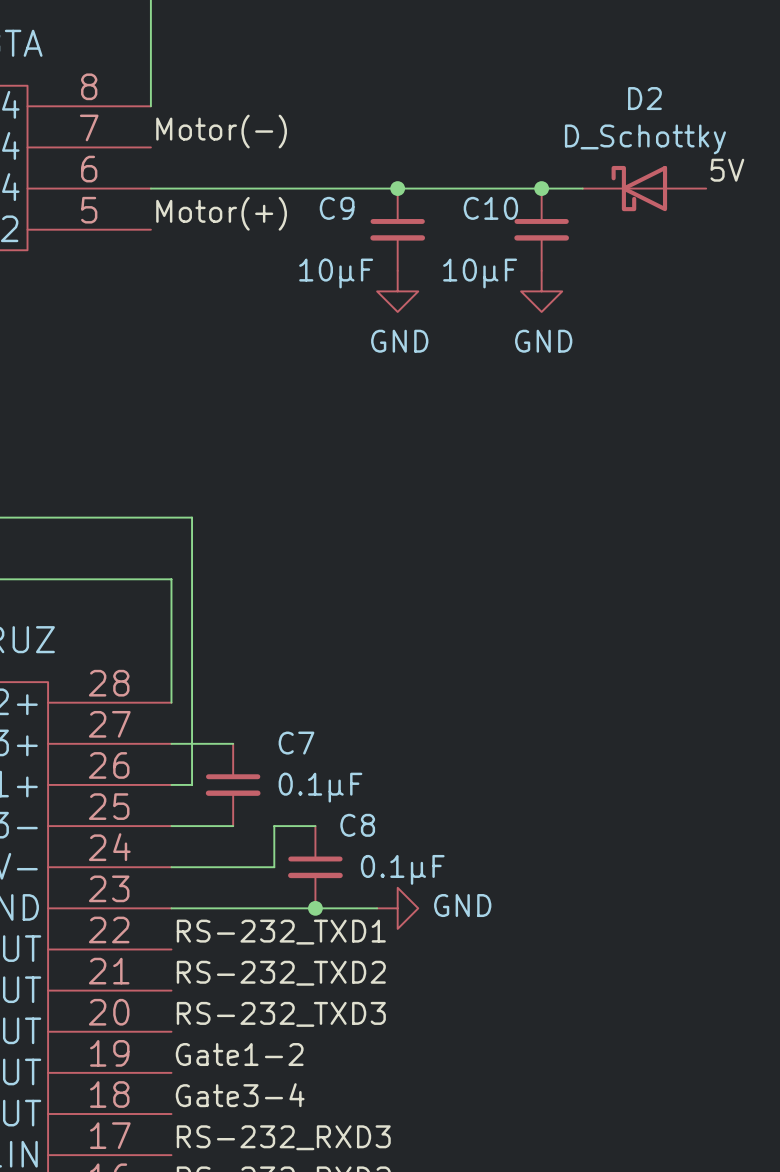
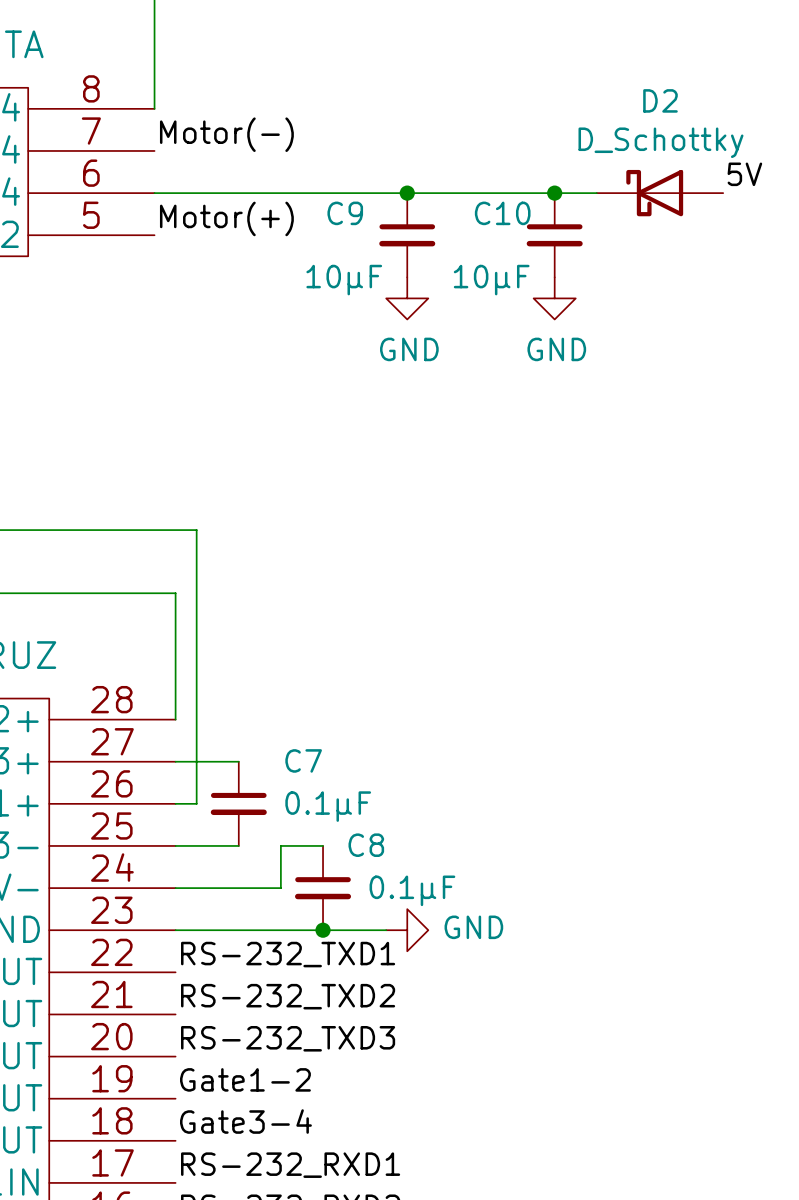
label: RS-232_RXD3 (283, 1137) -> RS-232_RXD1 (290, 1165)

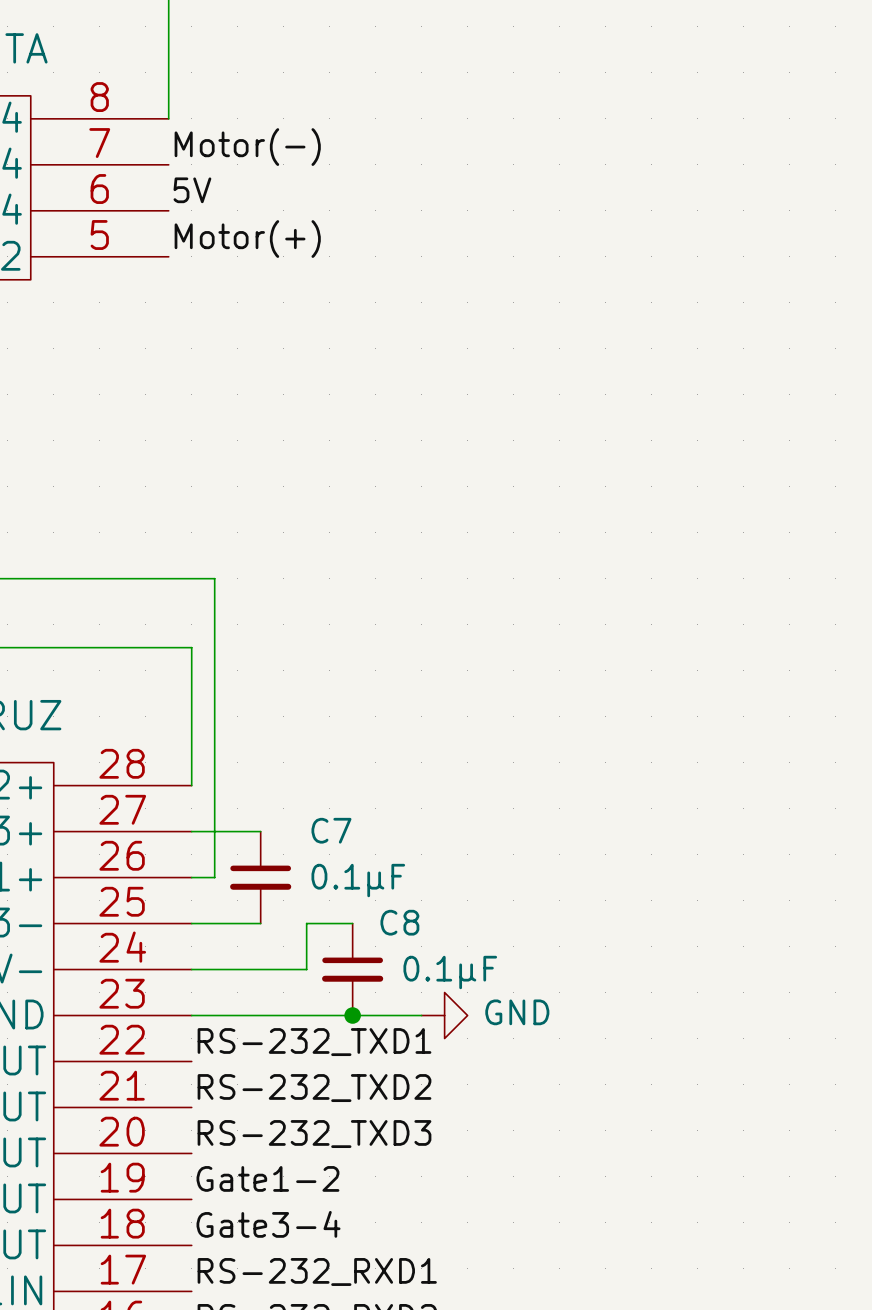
label: none -> 5V (192, 190)
label: 5V (744, 174) -> none
wire: (154, 193) (596, 193) -> none
junction: (407, 193) -> none
junction: (554, 193) -> none
D2: D_Schottky (659, 193) -> none
C9: 10µF (407, 235) -> none
C10: 10µF (554, 235) -> none
power symbol: GND (407, 298) -> none
power symbol: GND (554, 298) -> none

